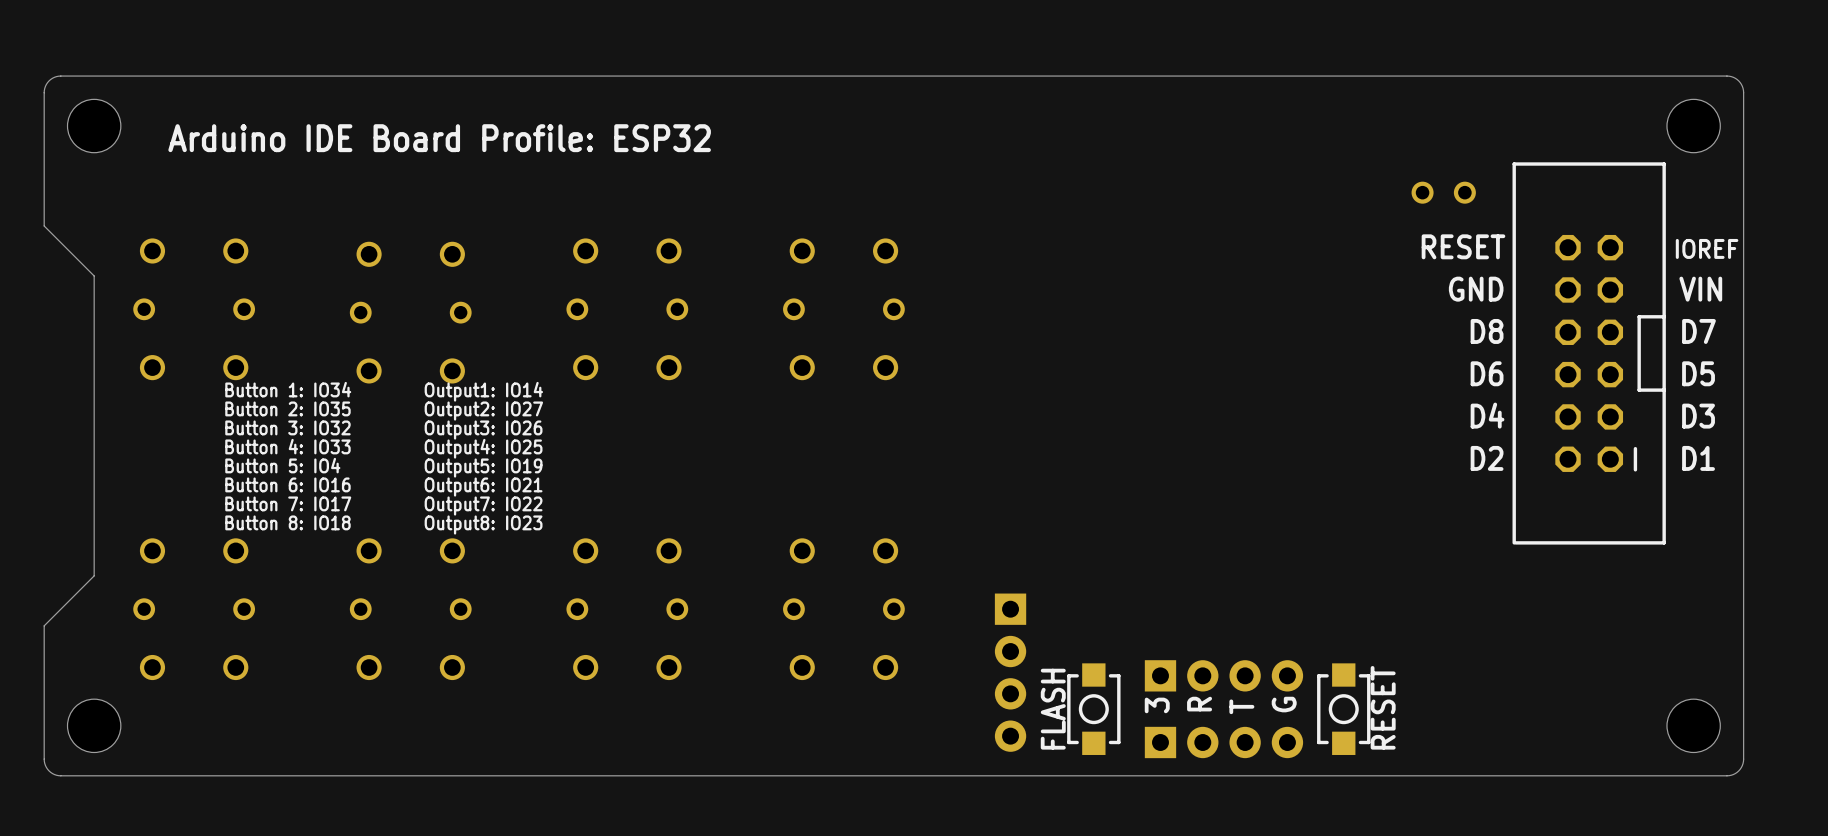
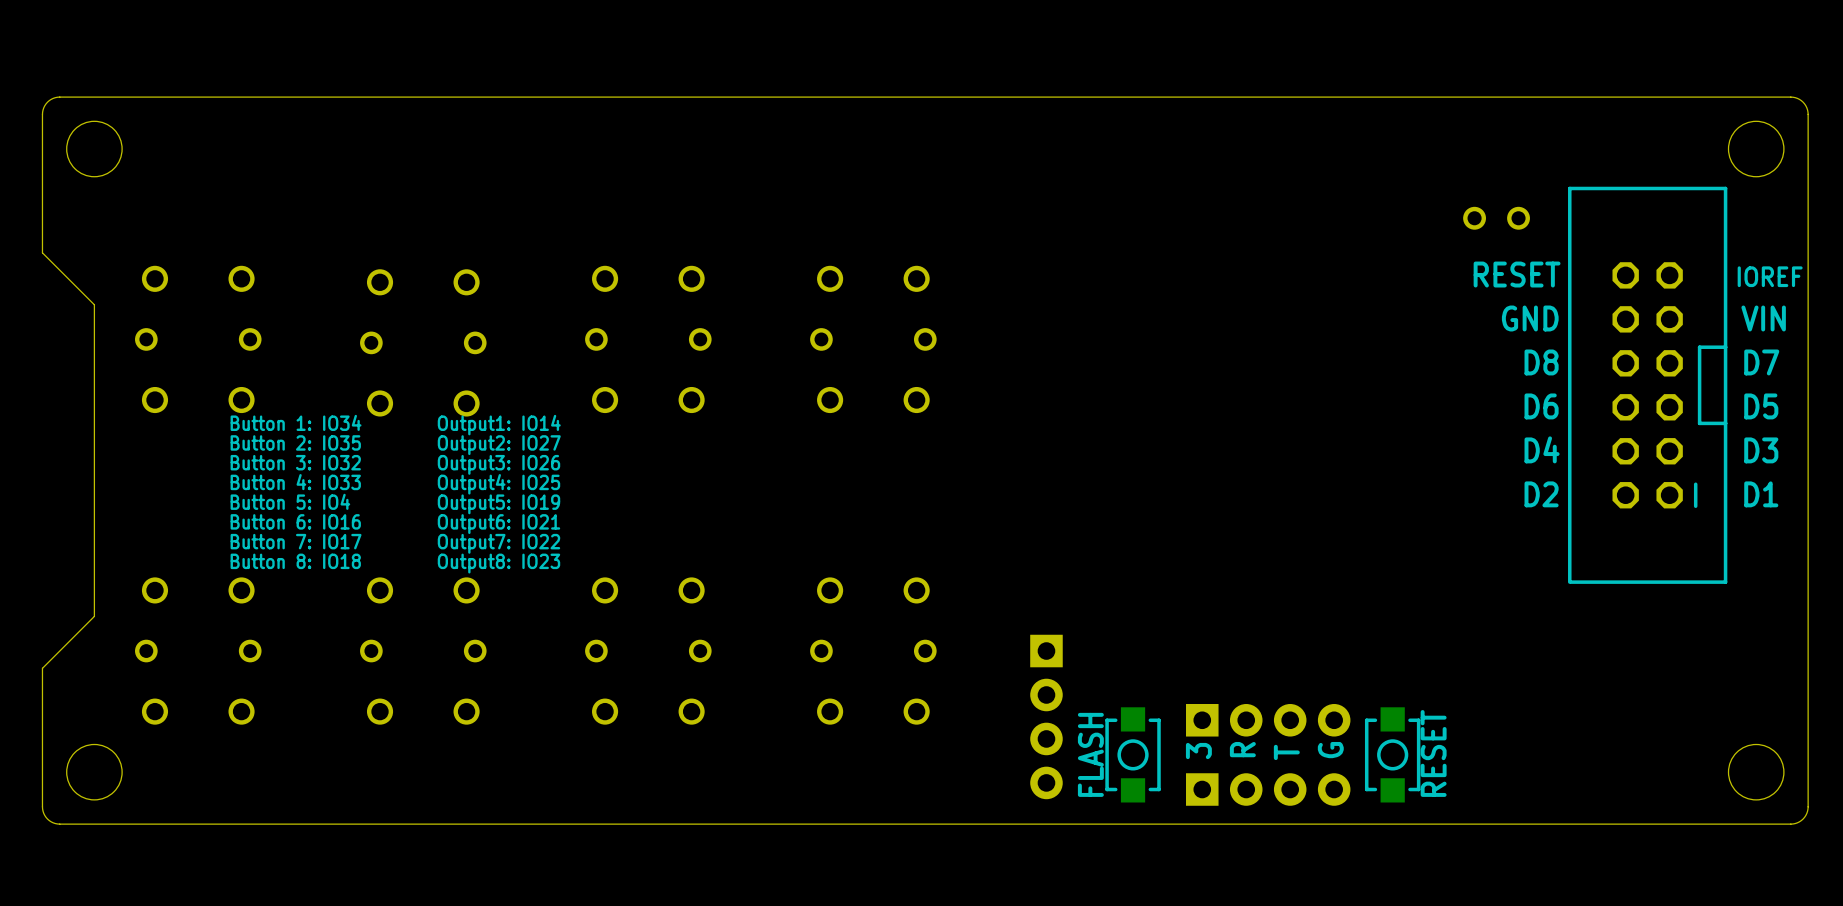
text: Arduino IDE Board Profile: ESP32 (439, 138) -> none

